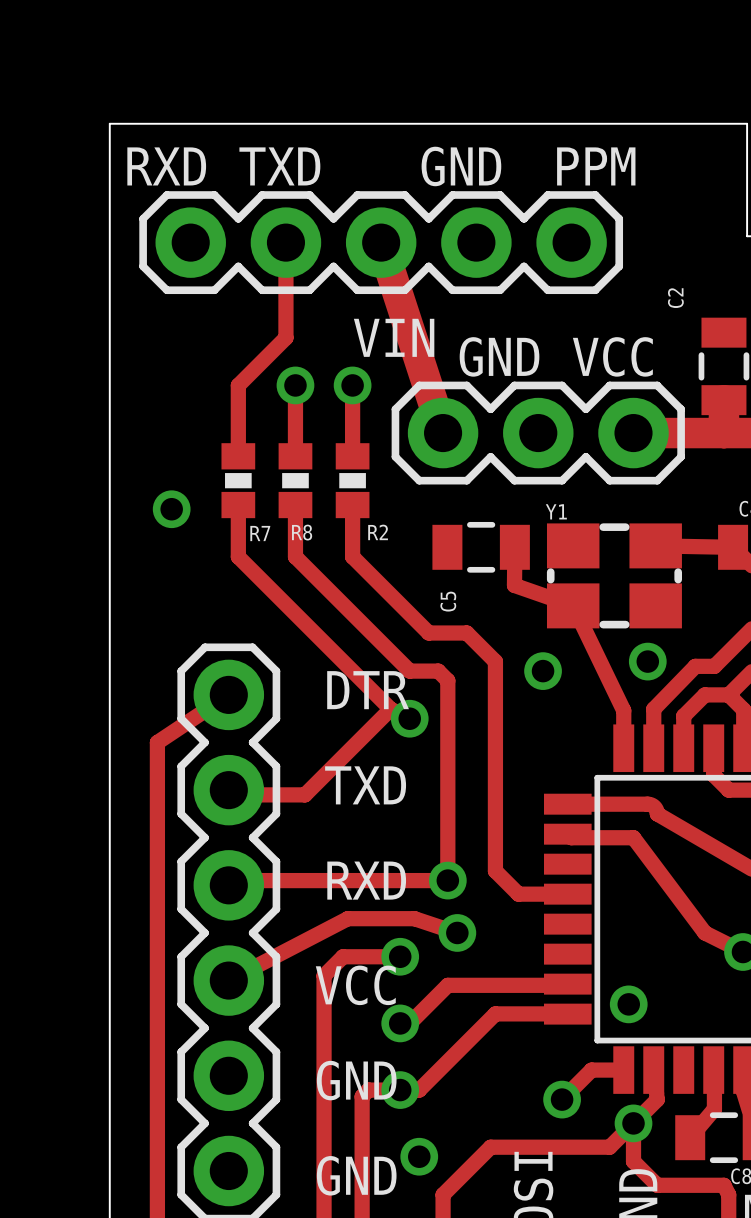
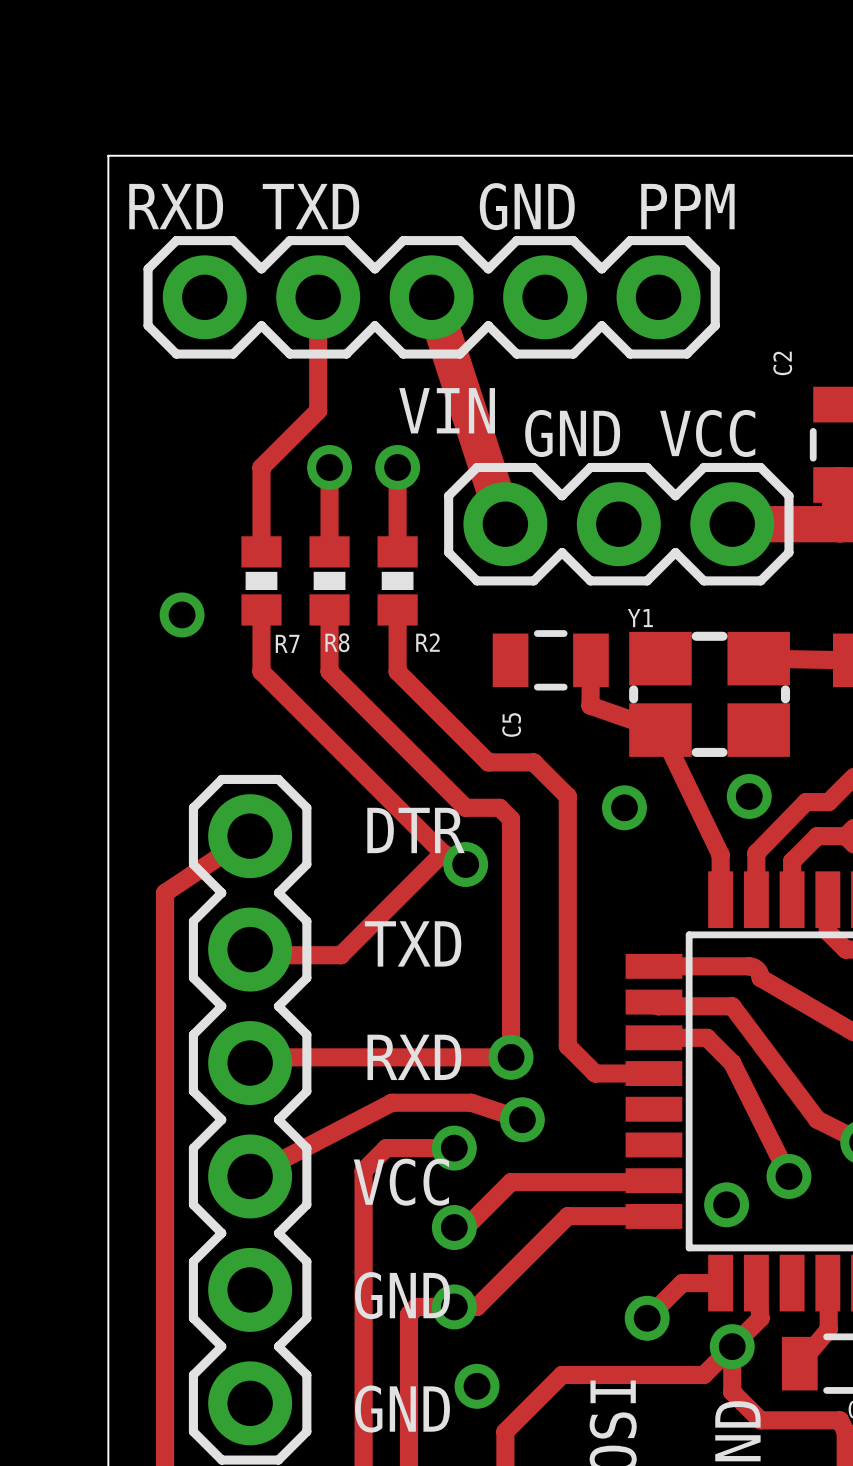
track: none -> (653, 1037) (707, 1037) (732, 1063) (788, 1176)
via: none -> (788, 1176)

